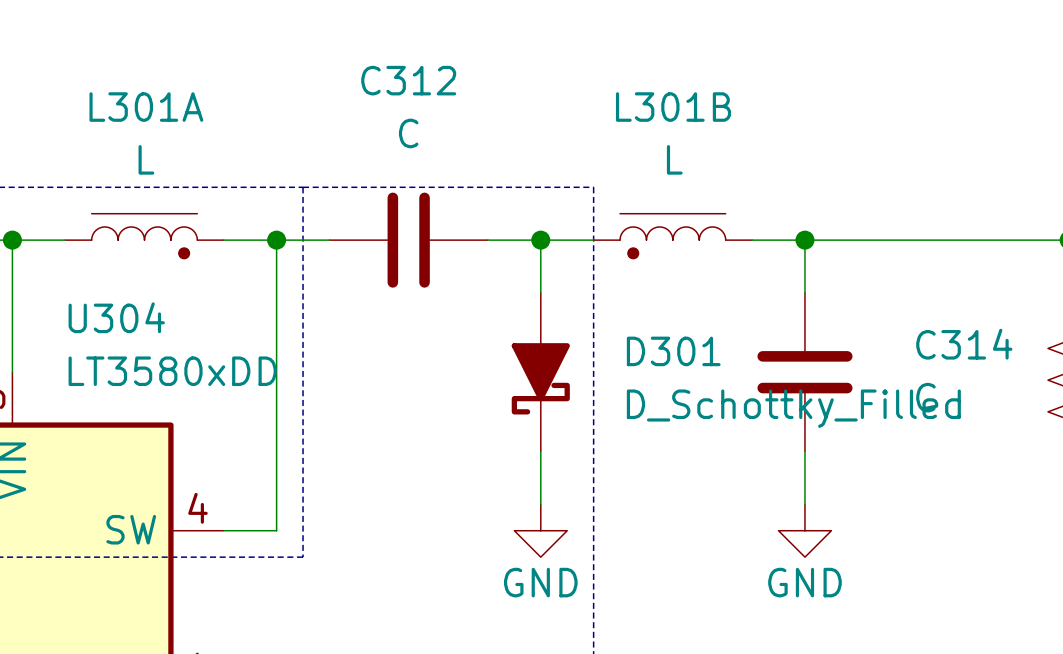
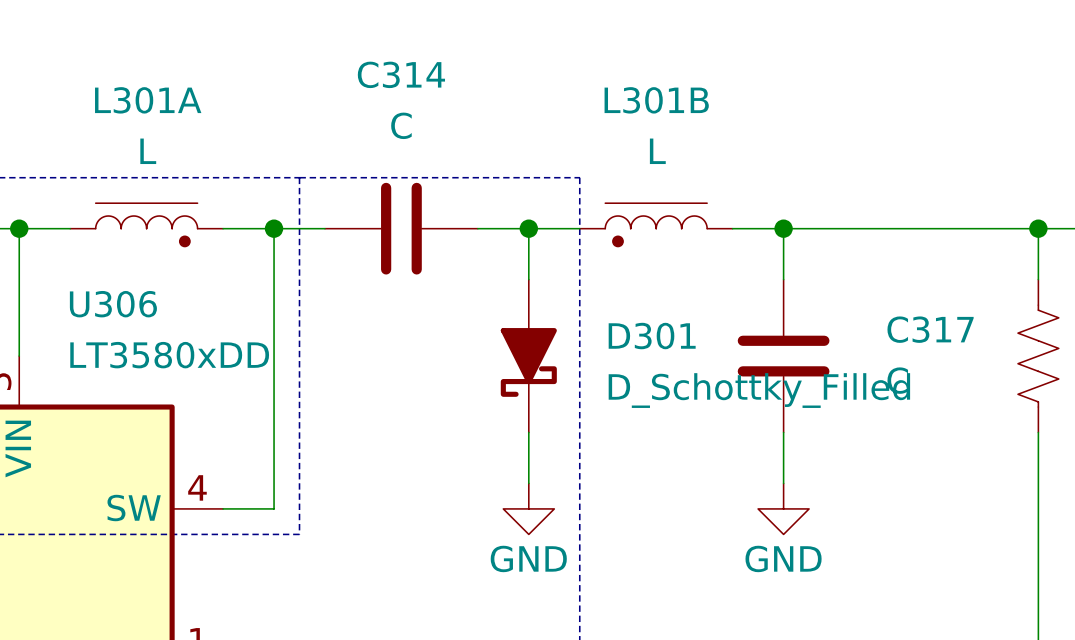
C312 name: C312 (408, 80) -> C314 (401, 74)
U304 name: U304 (116, 317) -> U306 (113, 304)
C314 name: C314 (964, 344) -> C317 (930, 329)

